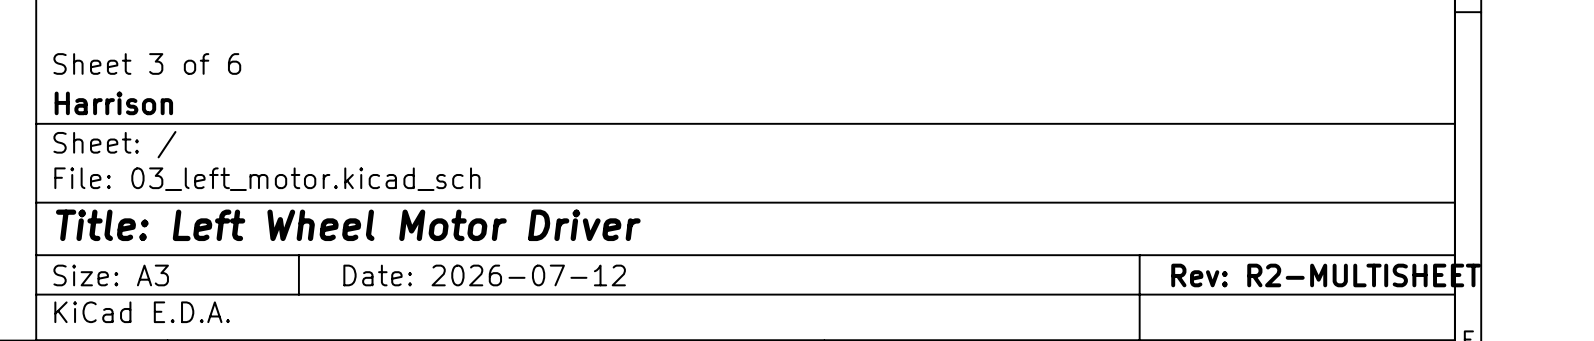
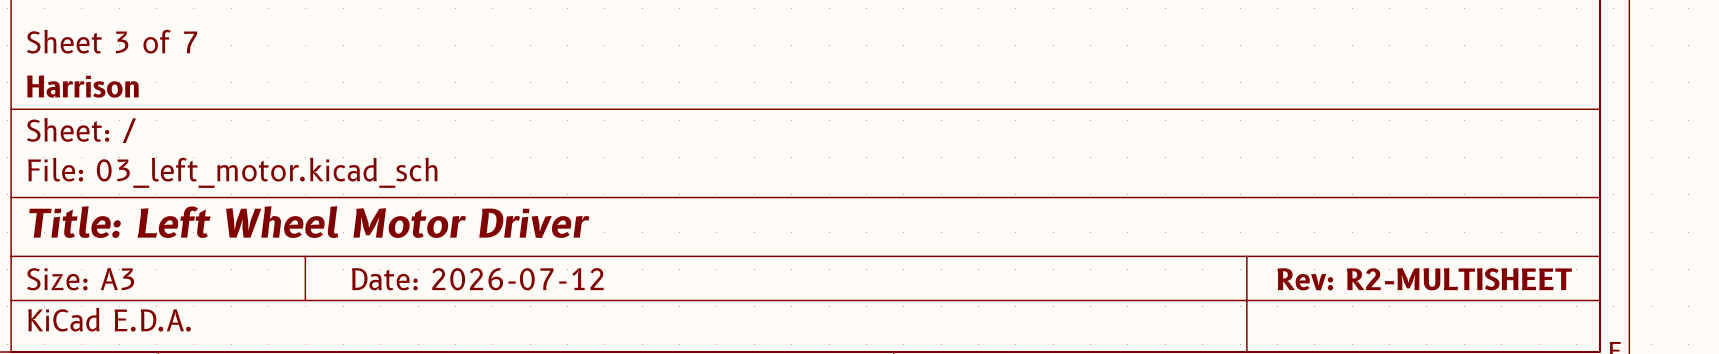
title block: Sheet 3 of 6 (147, 63) -> Sheet 3 of 7 (112, 41)

